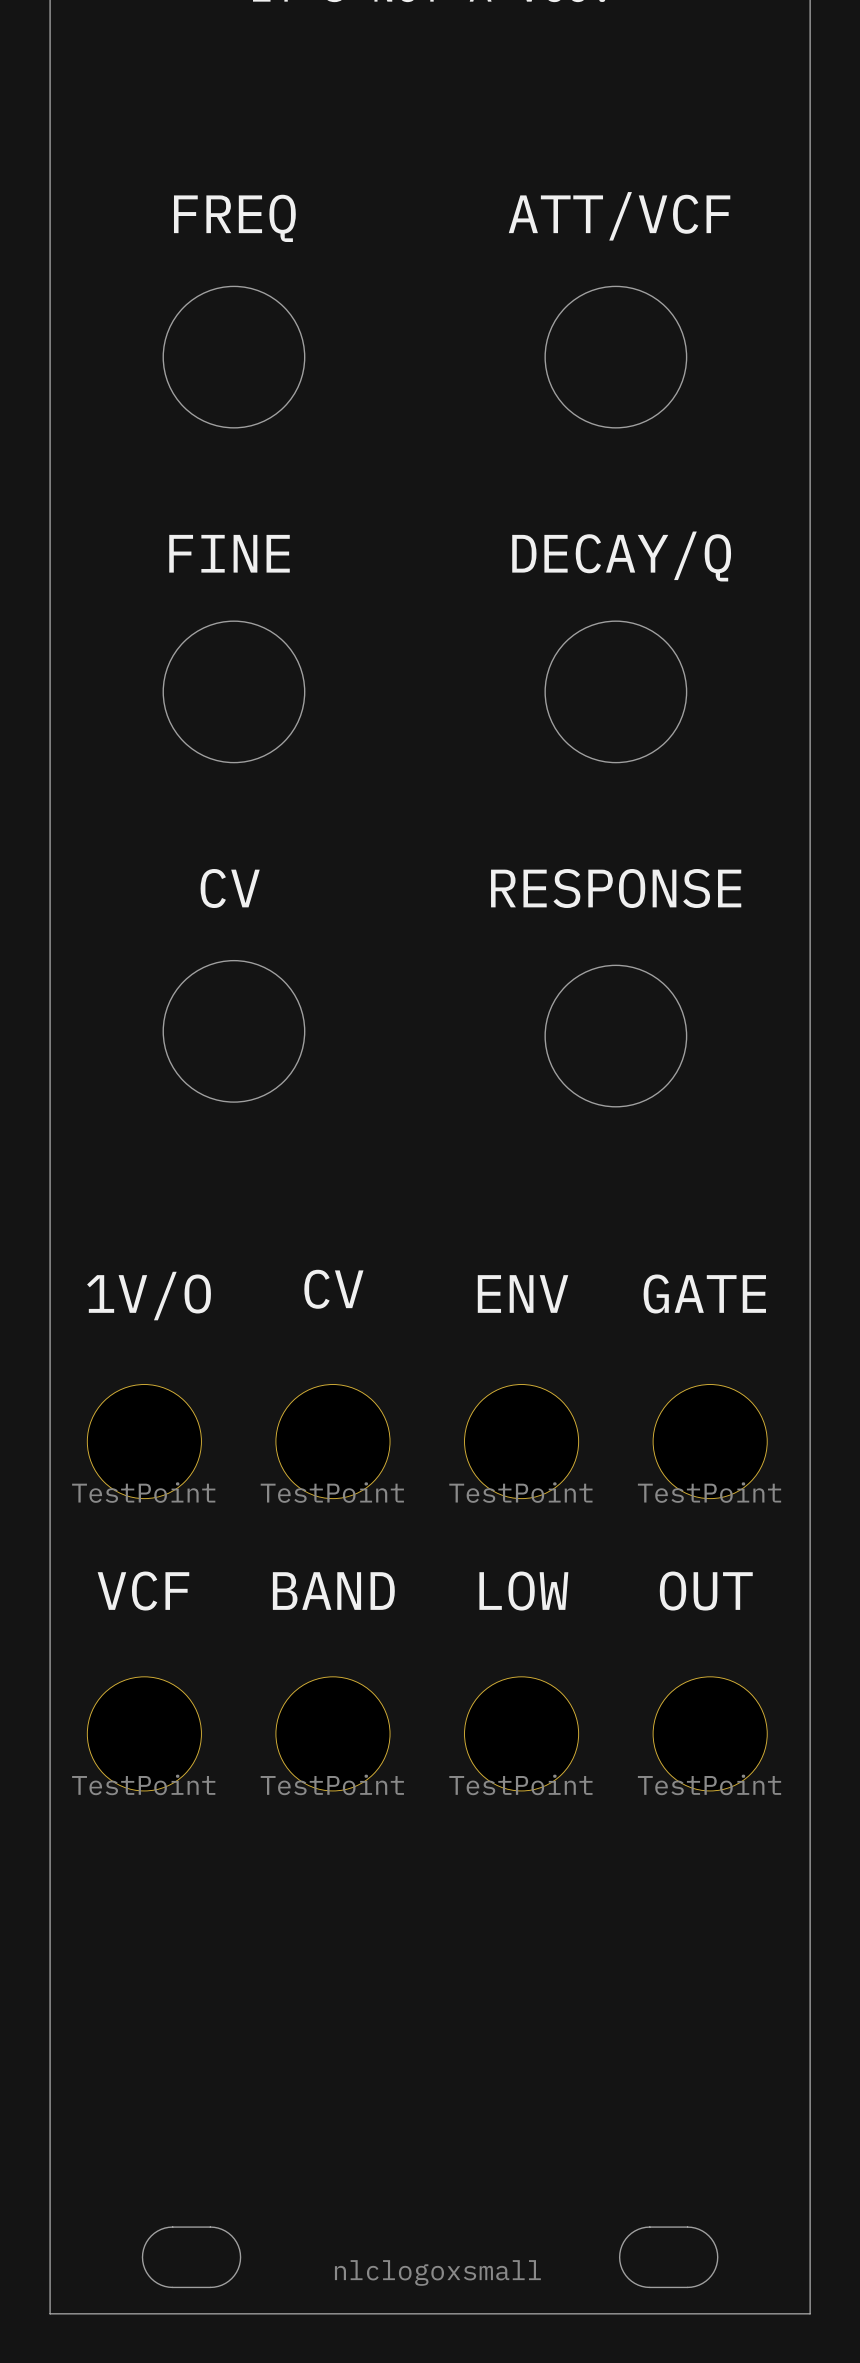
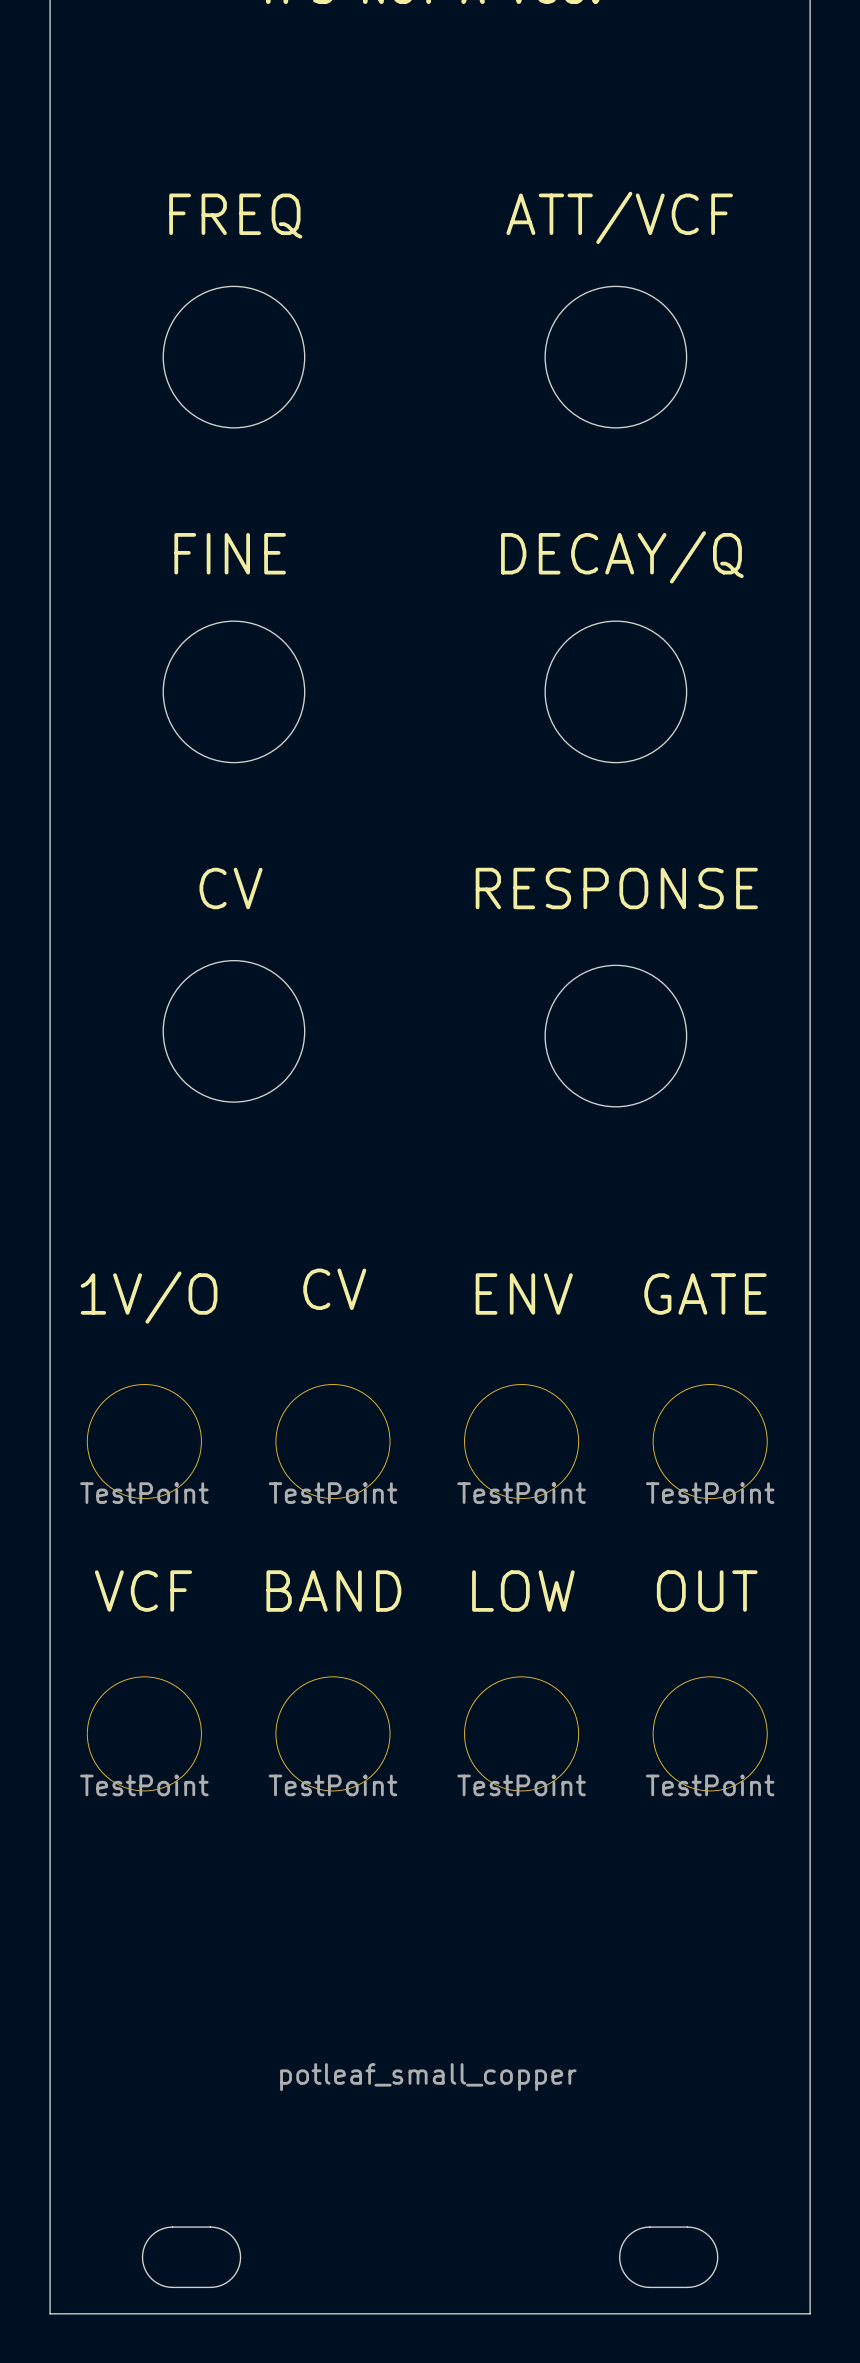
drawing: none -> [280, 2063, 577, 2092]
drawing: [334, 2260, 541, 2286] -> none

